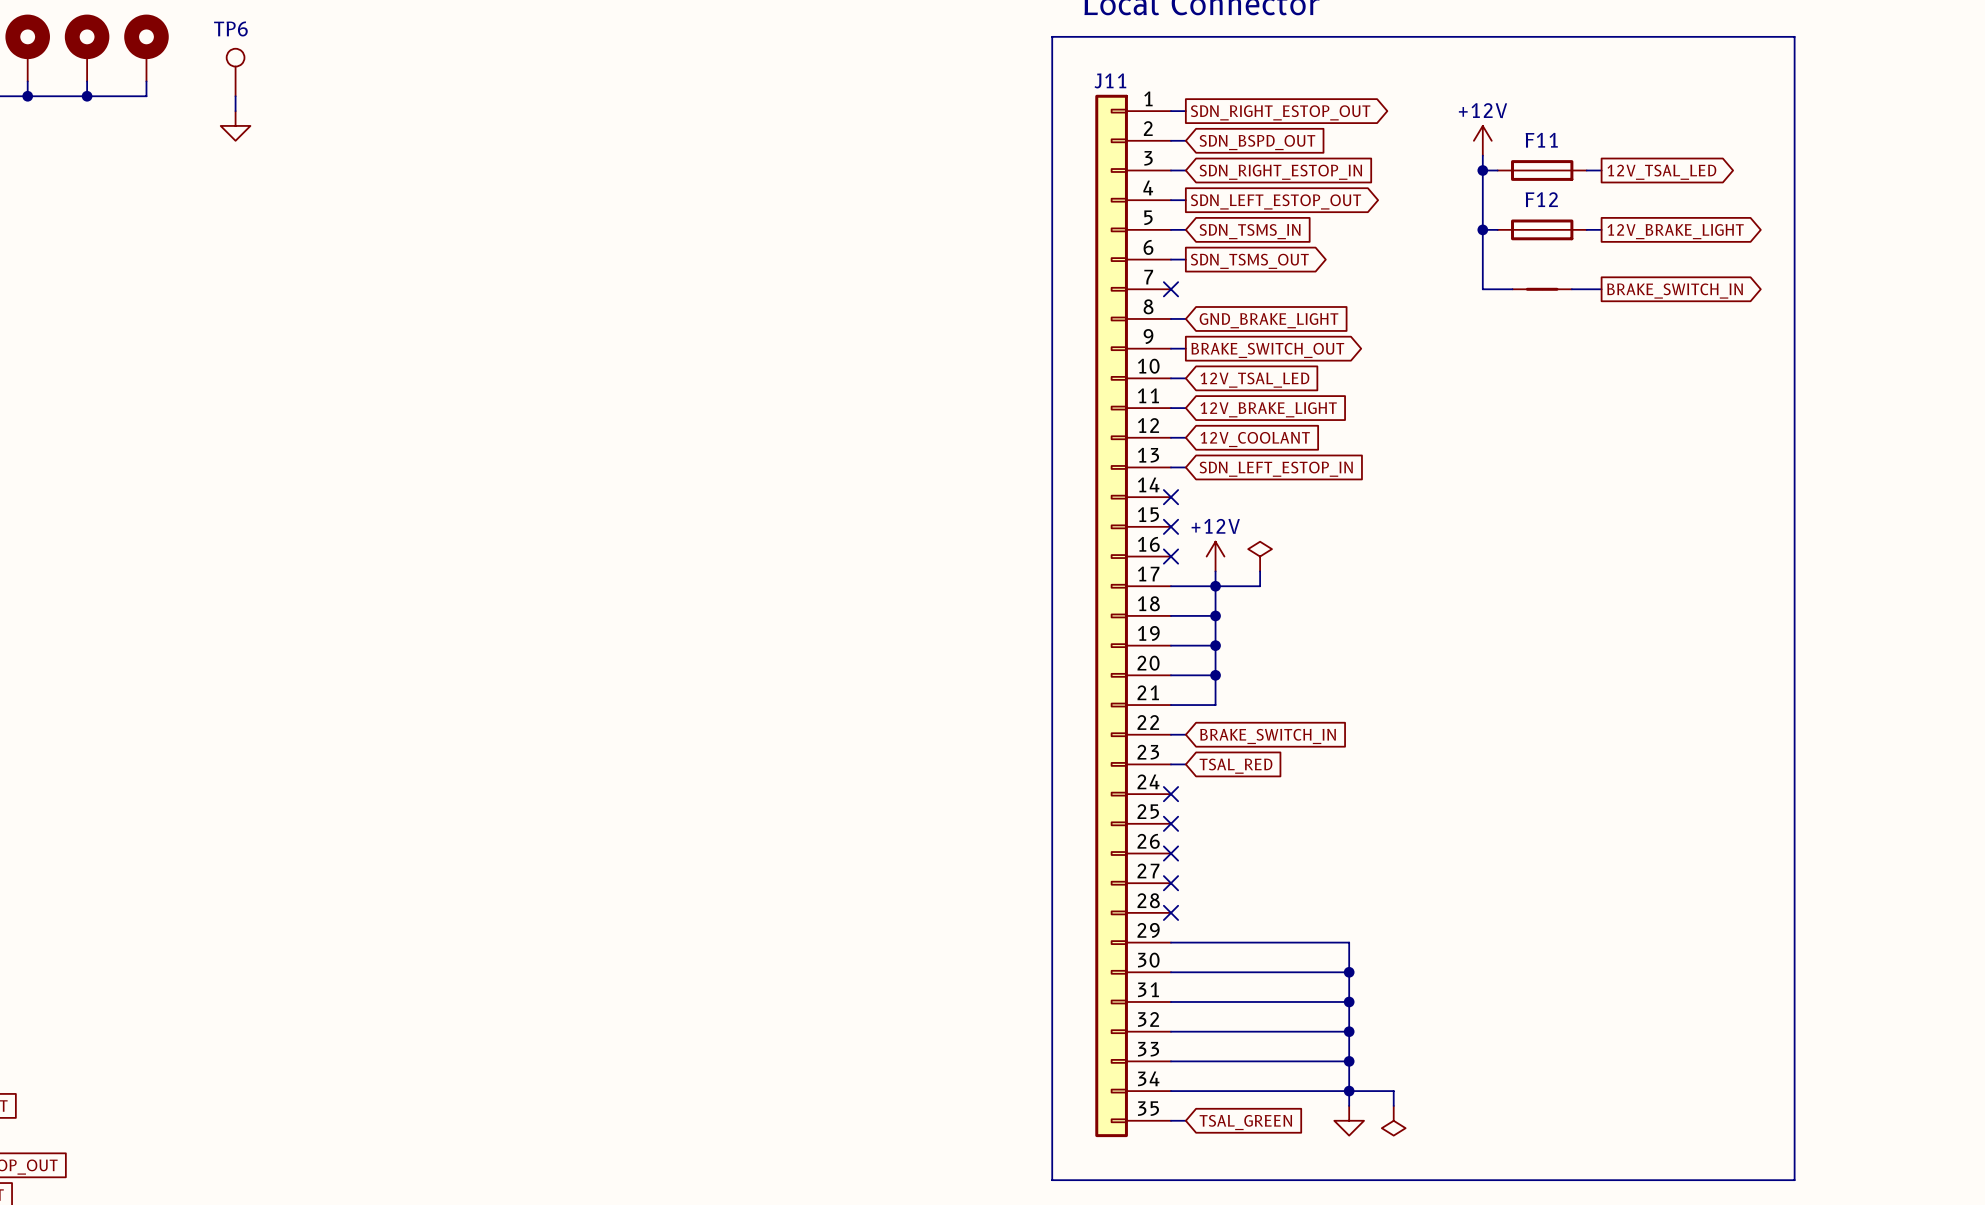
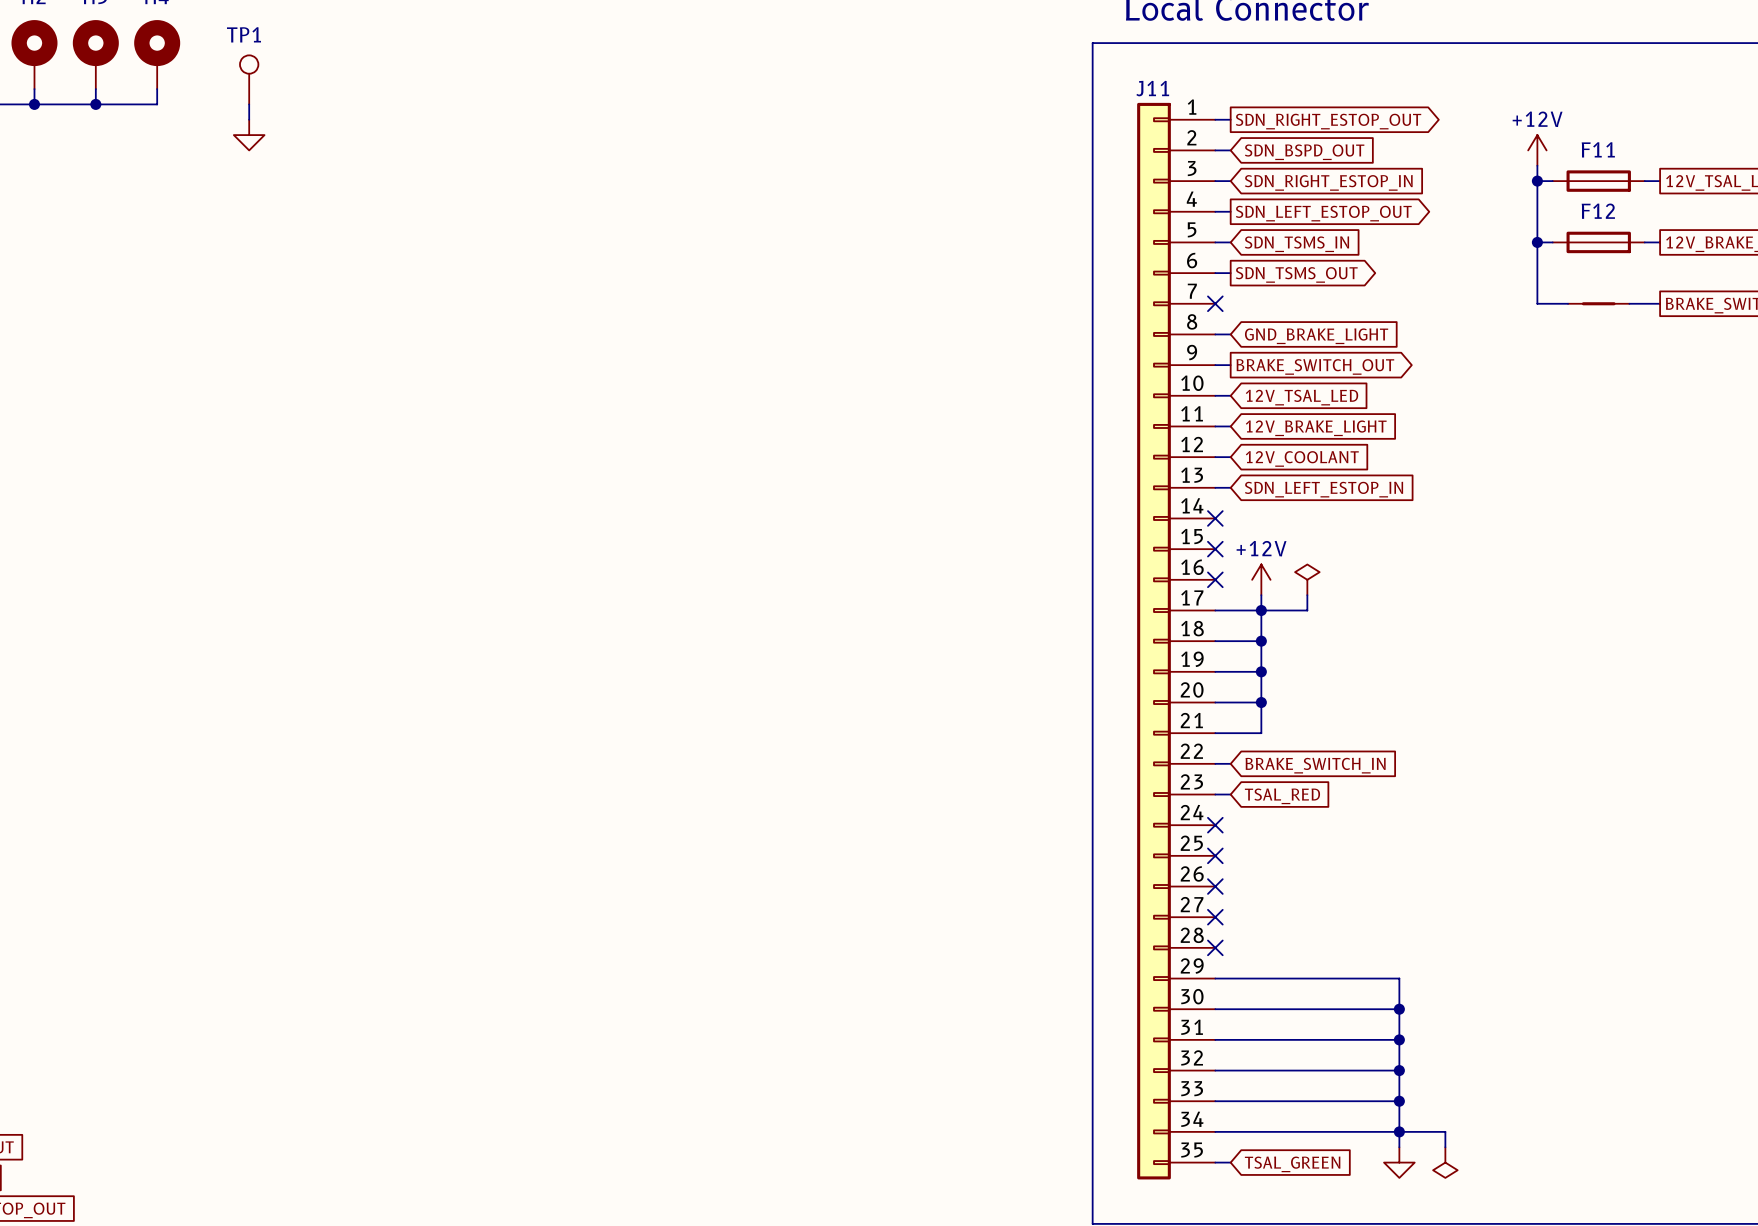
TP6 name: TP6 (230, 28) -> TP1 (243, 34)

